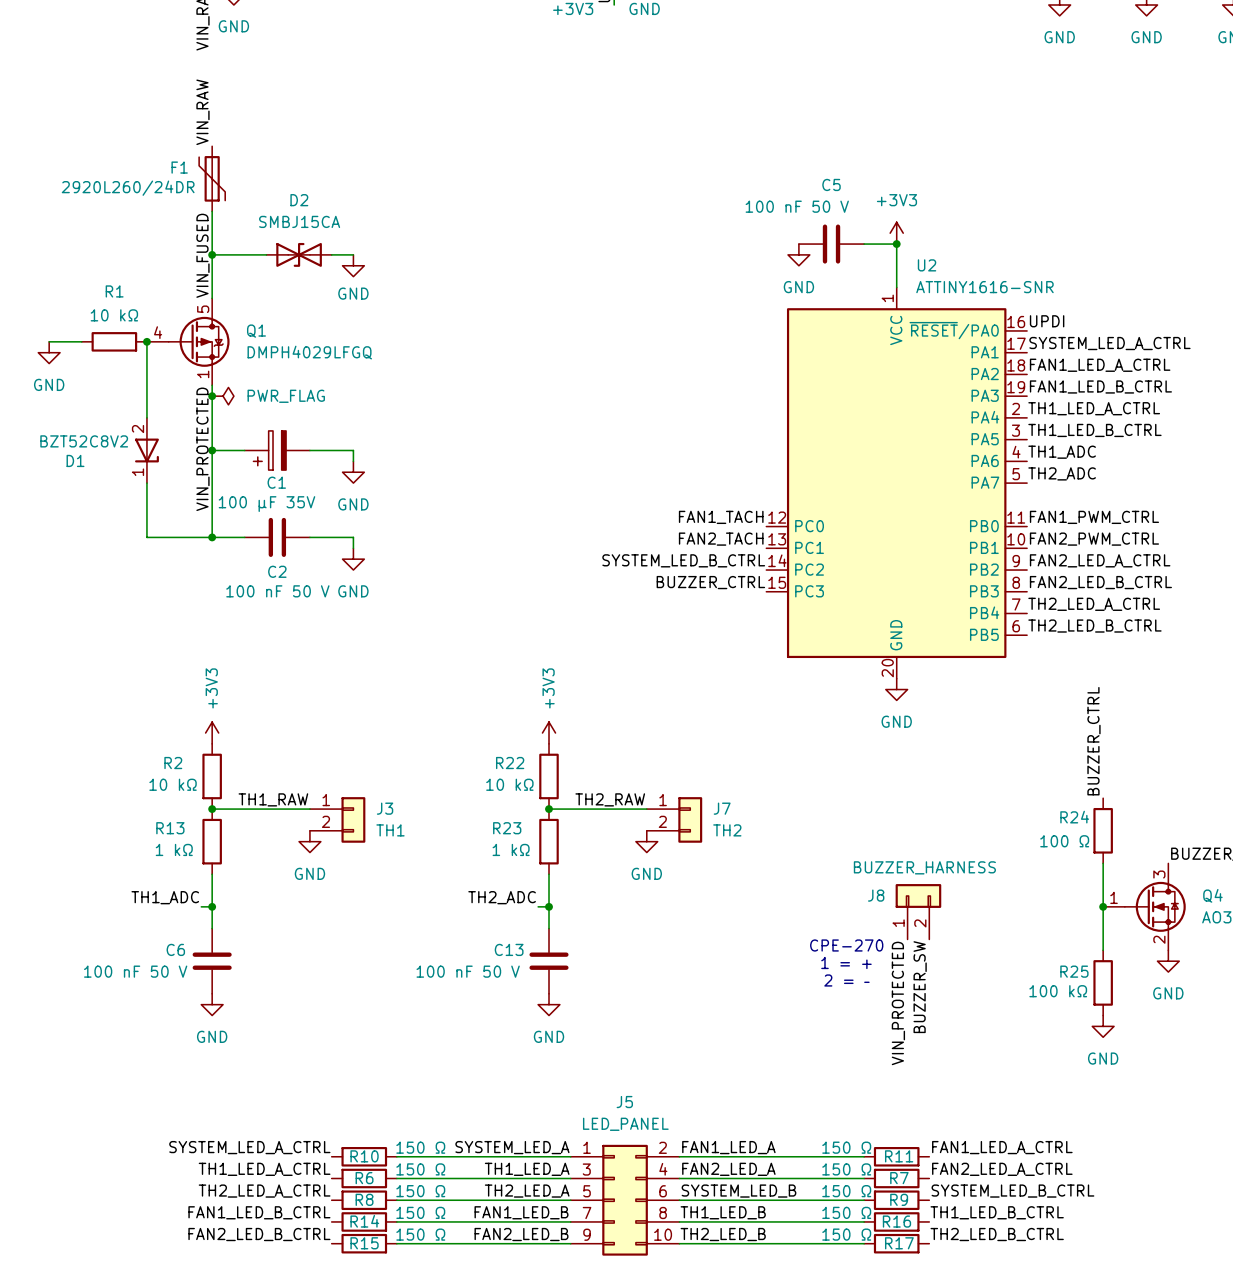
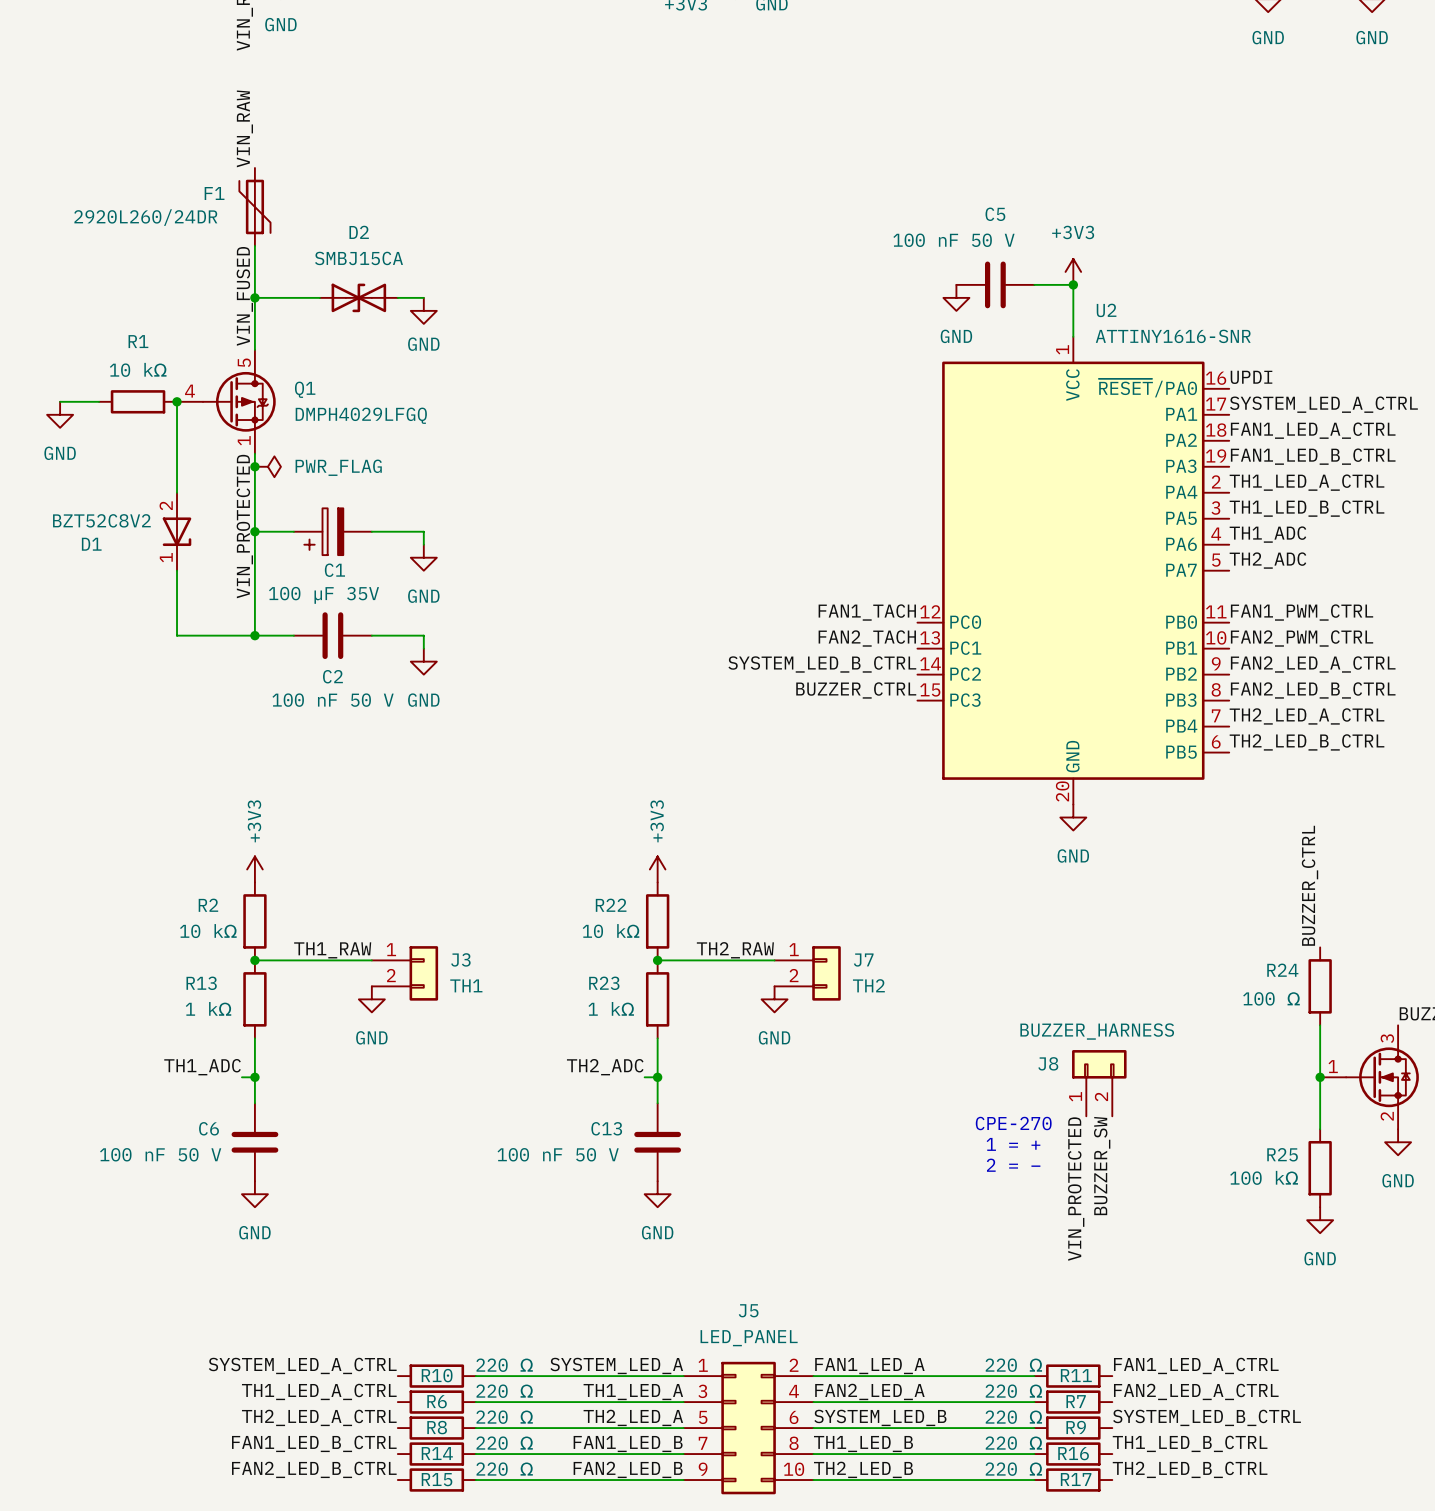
R10 value: 150 Ω (420, 1147) -> 220 Ω (504, 1365)
R11 value: 150 Ω (846, 1147) -> 220 Ω (1013, 1365)
R6 value: 150 Ω (420, 1169) -> 220 Ω (504, 1391)
R7 value: 150 Ω (846, 1169) -> 220 Ω (1013, 1391)
R8 value: 150 Ω (420, 1191) -> 220 Ω (504, 1417)
R9 value: 150 Ω (846, 1191) -> 220 Ω (1013, 1417)
R14 value: 150 Ω (420, 1212) -> 220 Ω (504, 1443)
R16 value: 150 Ω (846, 1212) -> 220 Ω (1013, 1443)
R15 value: 150 Ω (420, 1234) -> 220 Ω (504, 1469)
R17 value: 150 Ω (846, 1234) -> 220 Ω (1013, 1469)

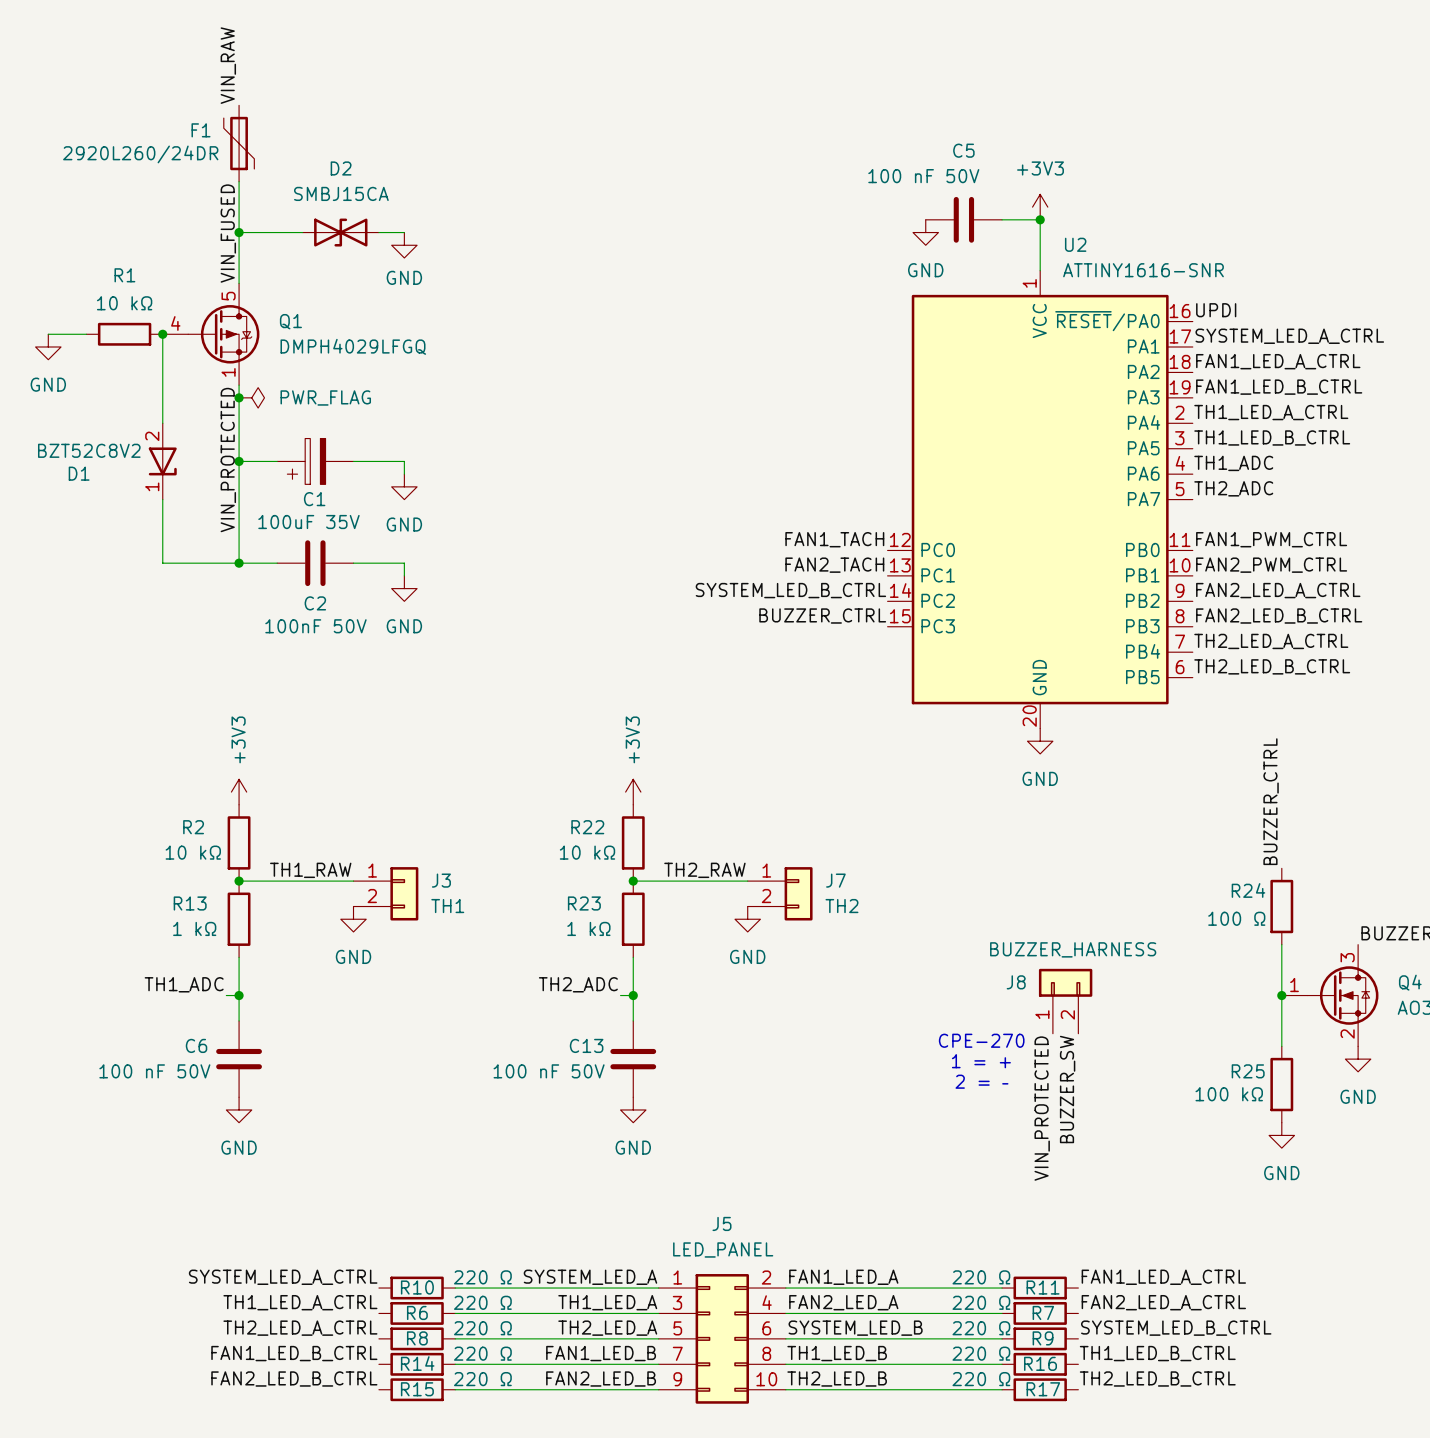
C5 value: 100 nF 50 V (953, 240) -> 100 nF 50V (923, 176)
C1 value: 100 µF 35V (323, 595) -> 100uF 35V (308, 522)
C2 value: 100 nF 50 V (333, 700) -> 100nF 50V (315, 626)
C6 value: 100 nF 50 V (160, 1154) -> 100 nF 50V (154, 1071)
C13 value: 100 nF 50 V (558, 1154) -> 100 nF 50V (549, 1071)

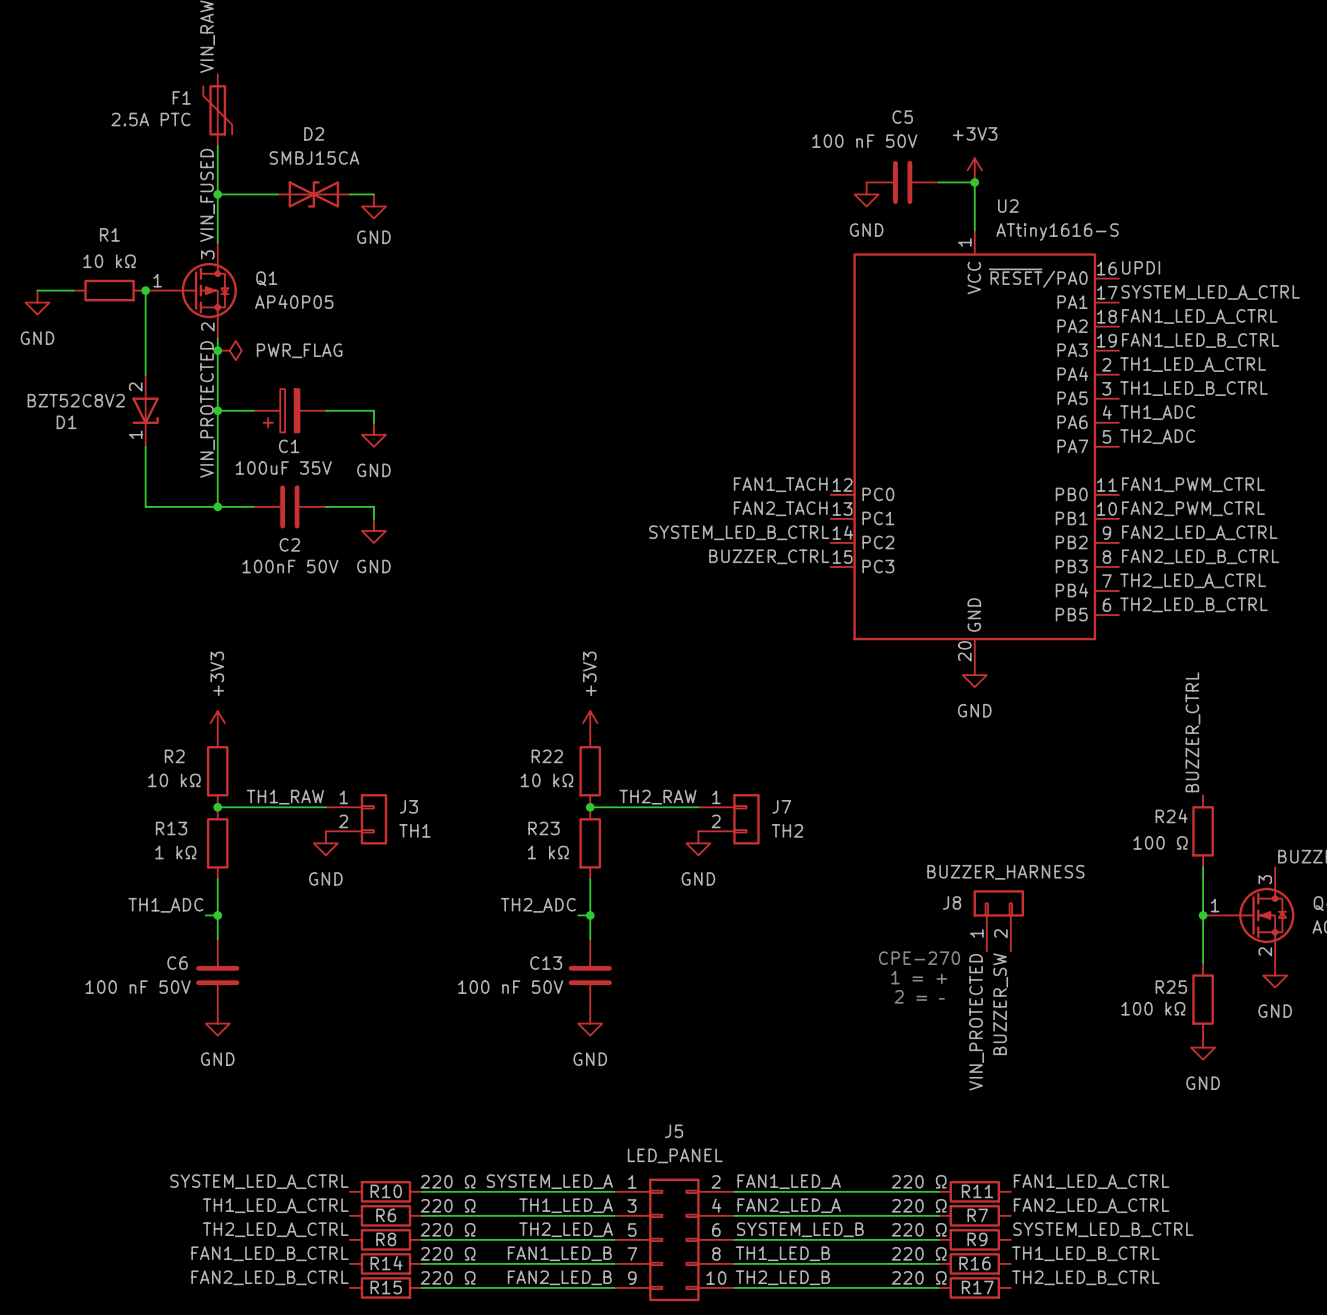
F1 value: 2920L260/24DR (140, 154) -> 2.5A PTC (150, 119)
U2 value: ATTINY1616-SNR (1143, 270) -> ATtiny1616-S (1057, 232)
Q1 symbol: [162, 283, 260, 386] -> [145, 242, 237, 339]
Q1 value: DMPH4029LFGQ (353, 346) -> AP40P05 (294, 301)

